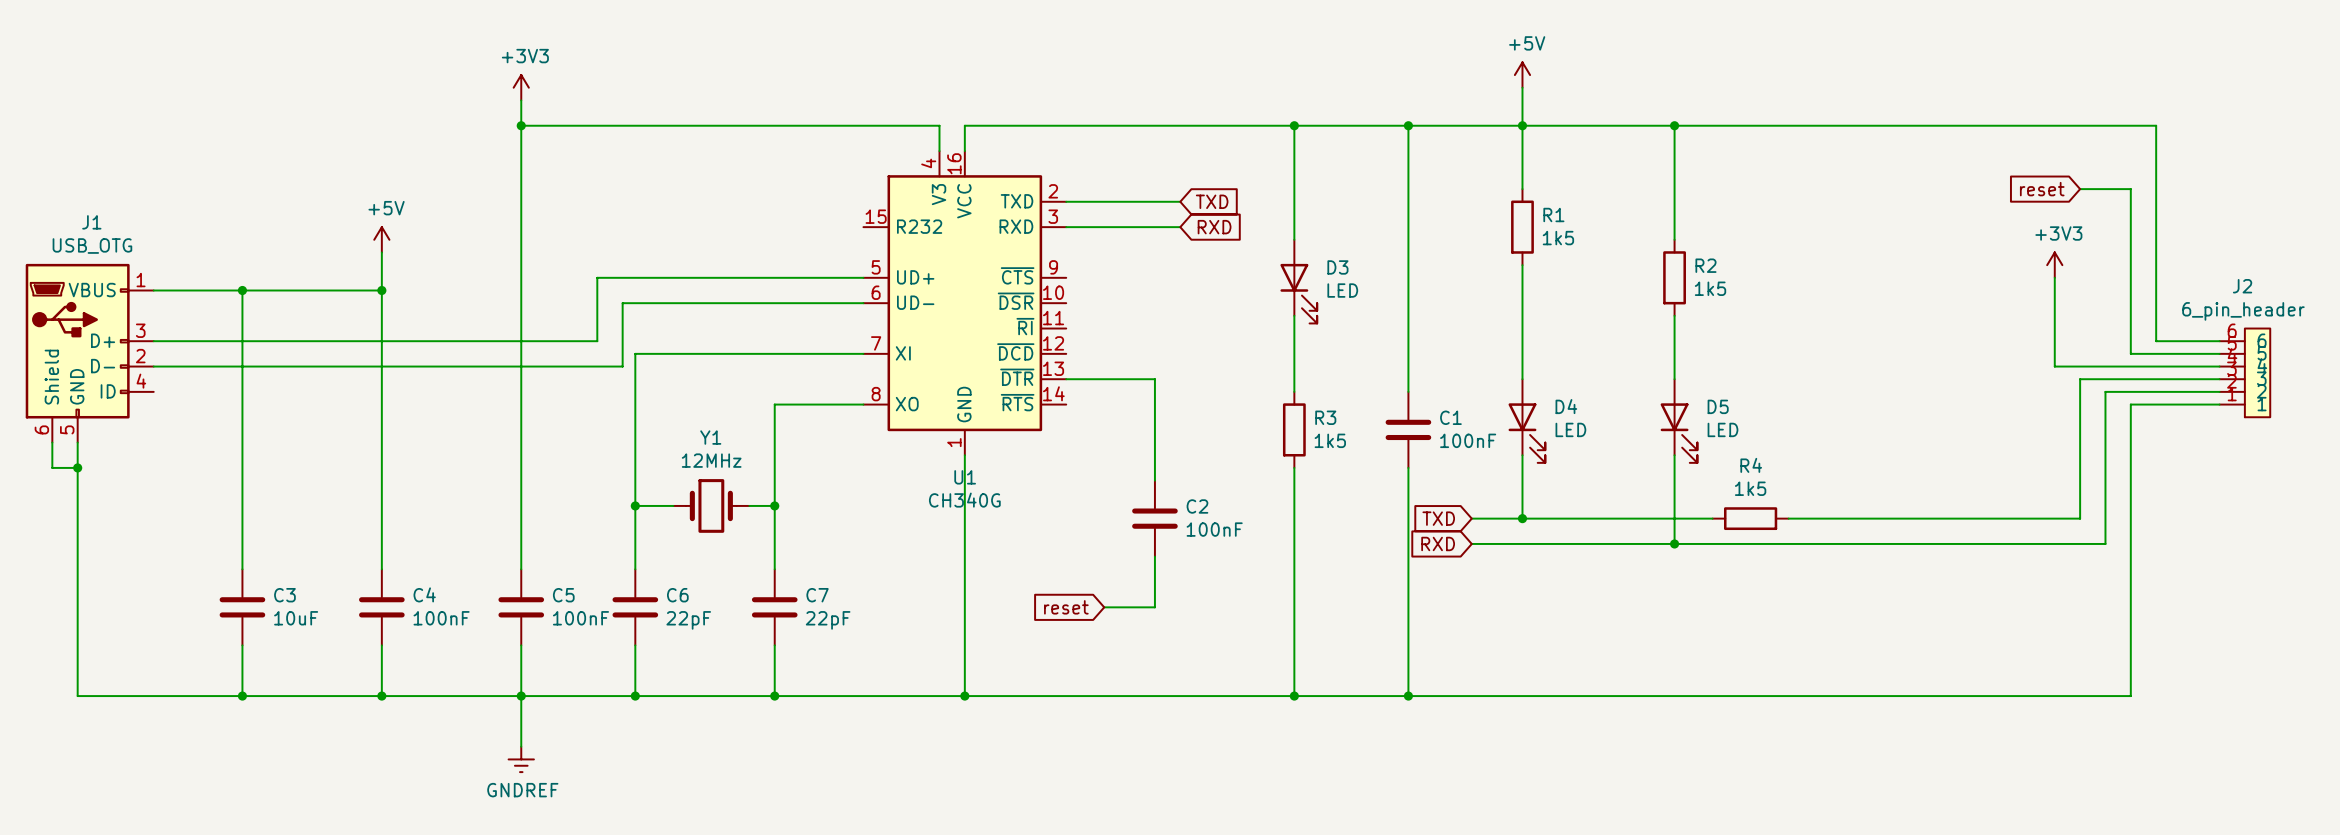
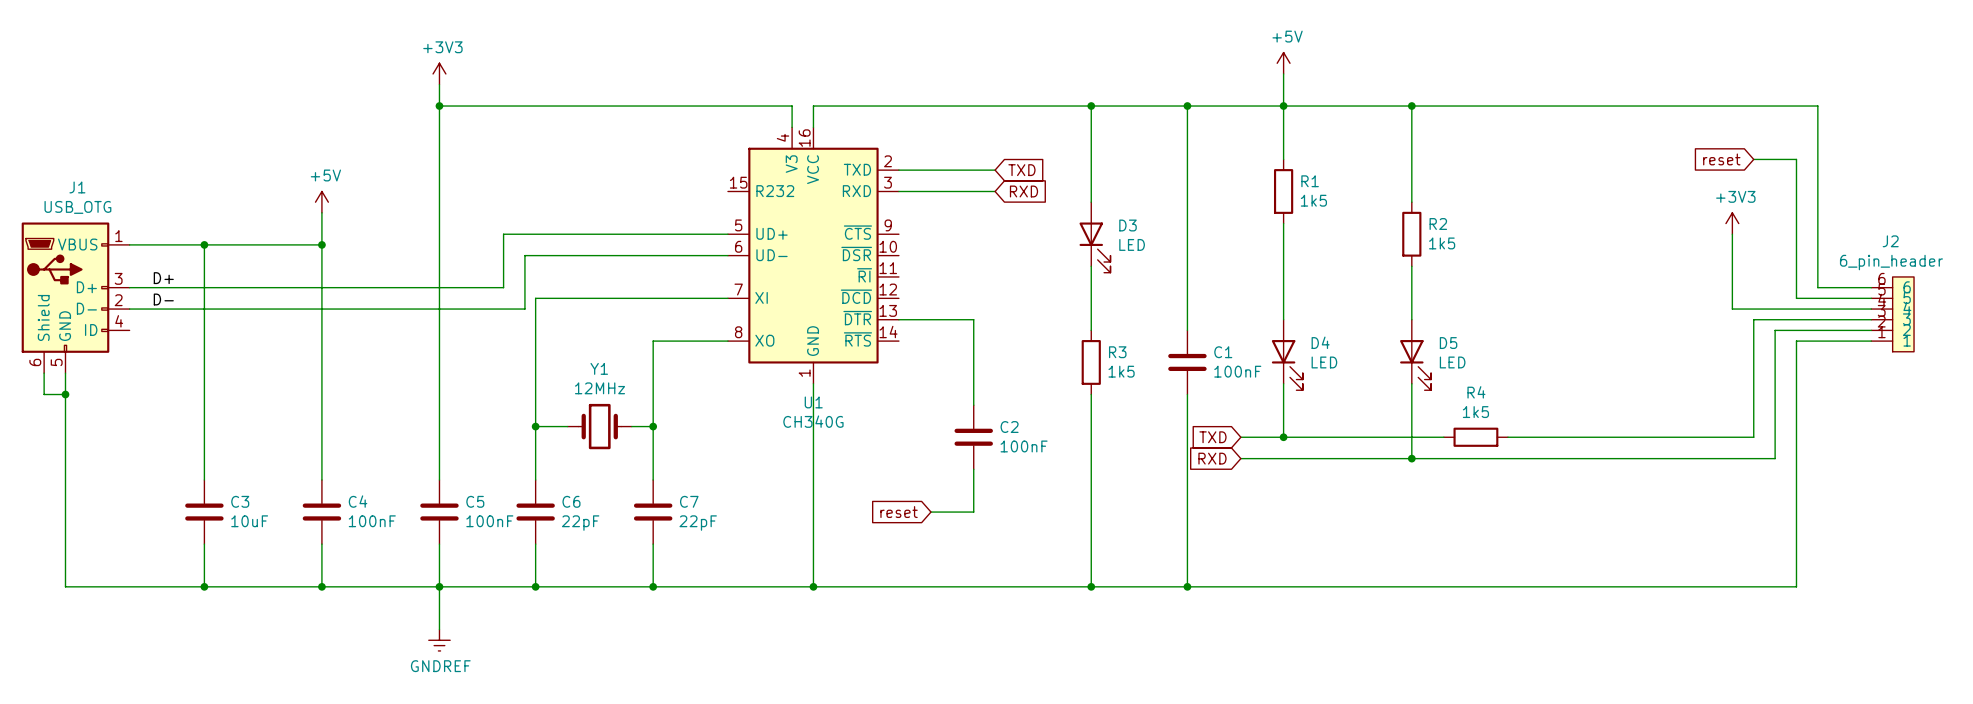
label: none -> D+ (163, 278)
label: none -> D- (163, 299)

